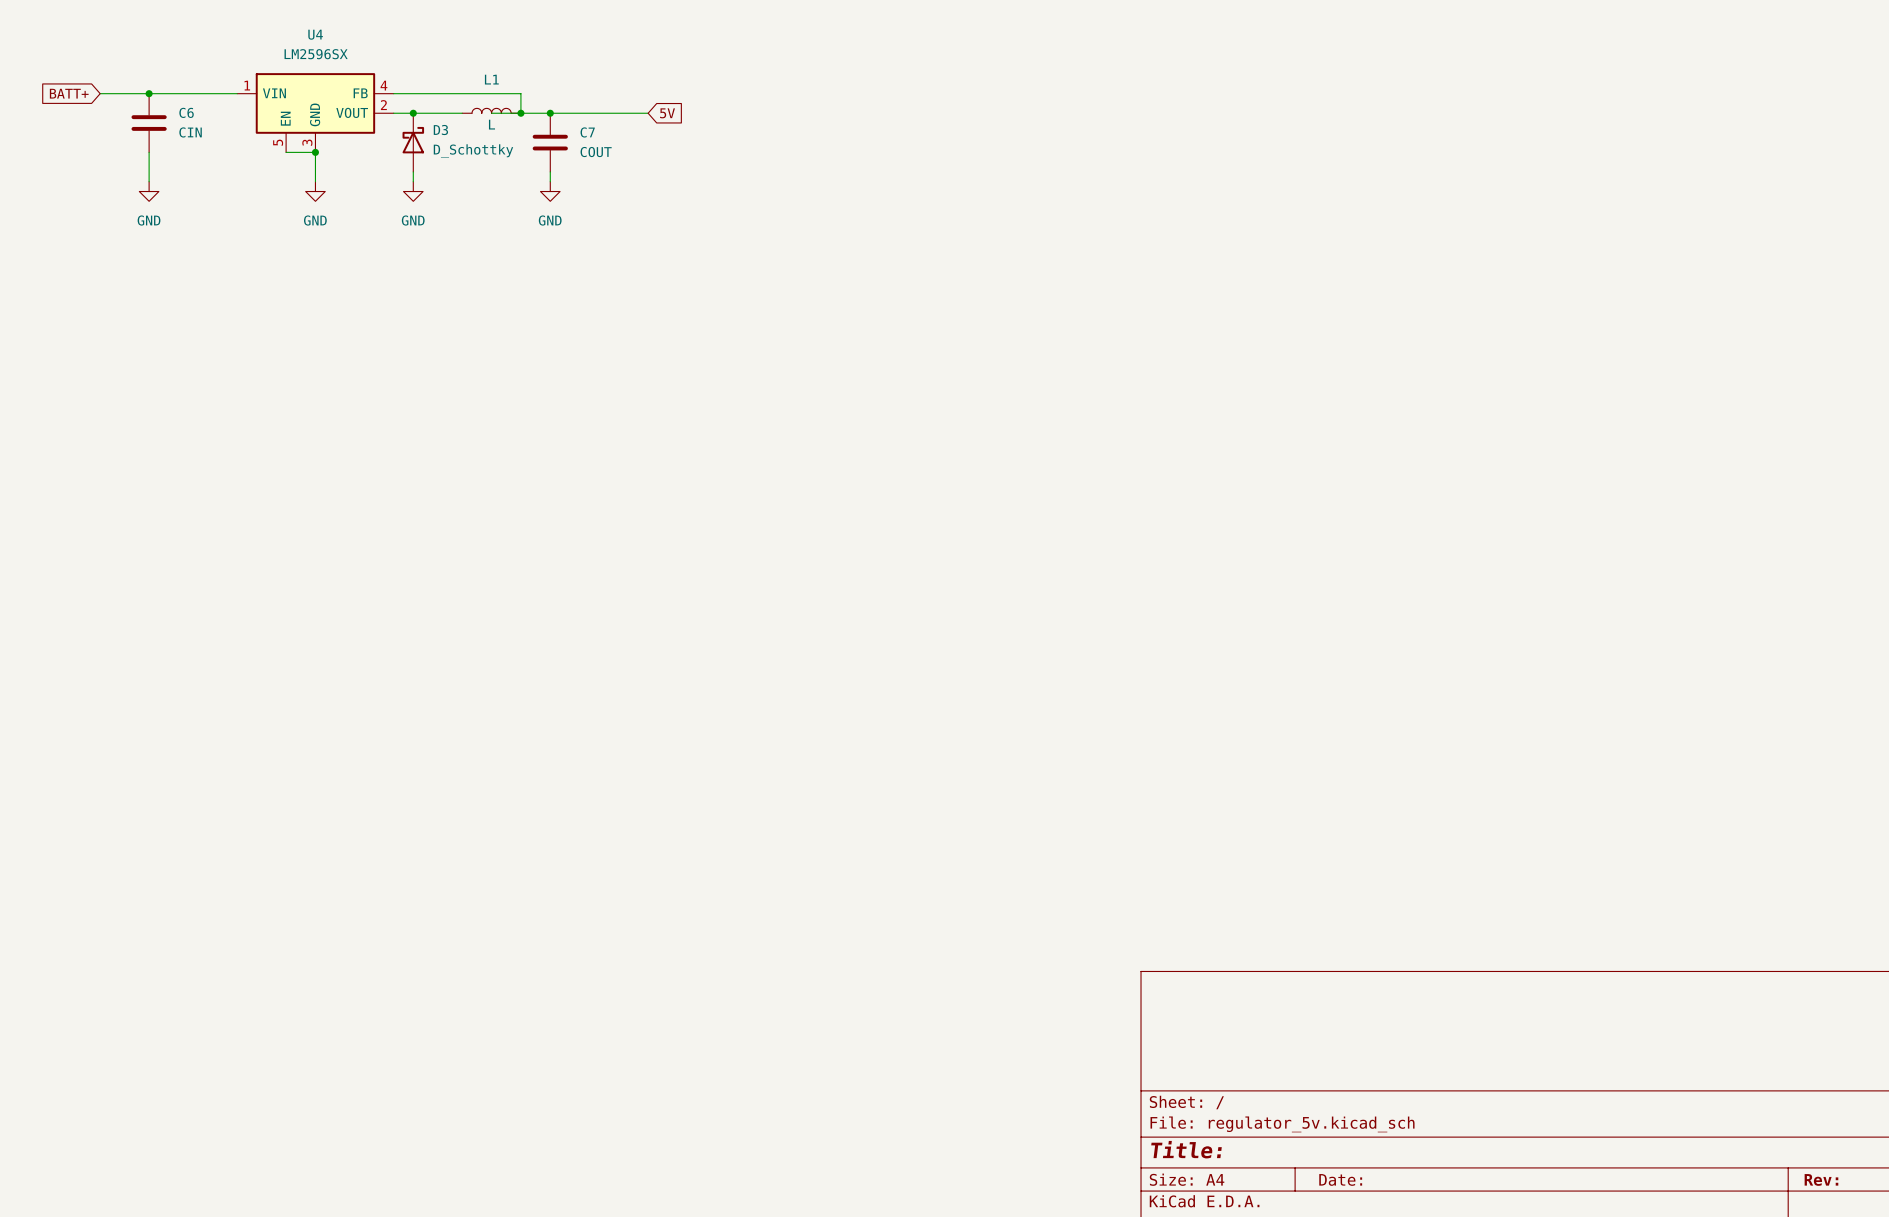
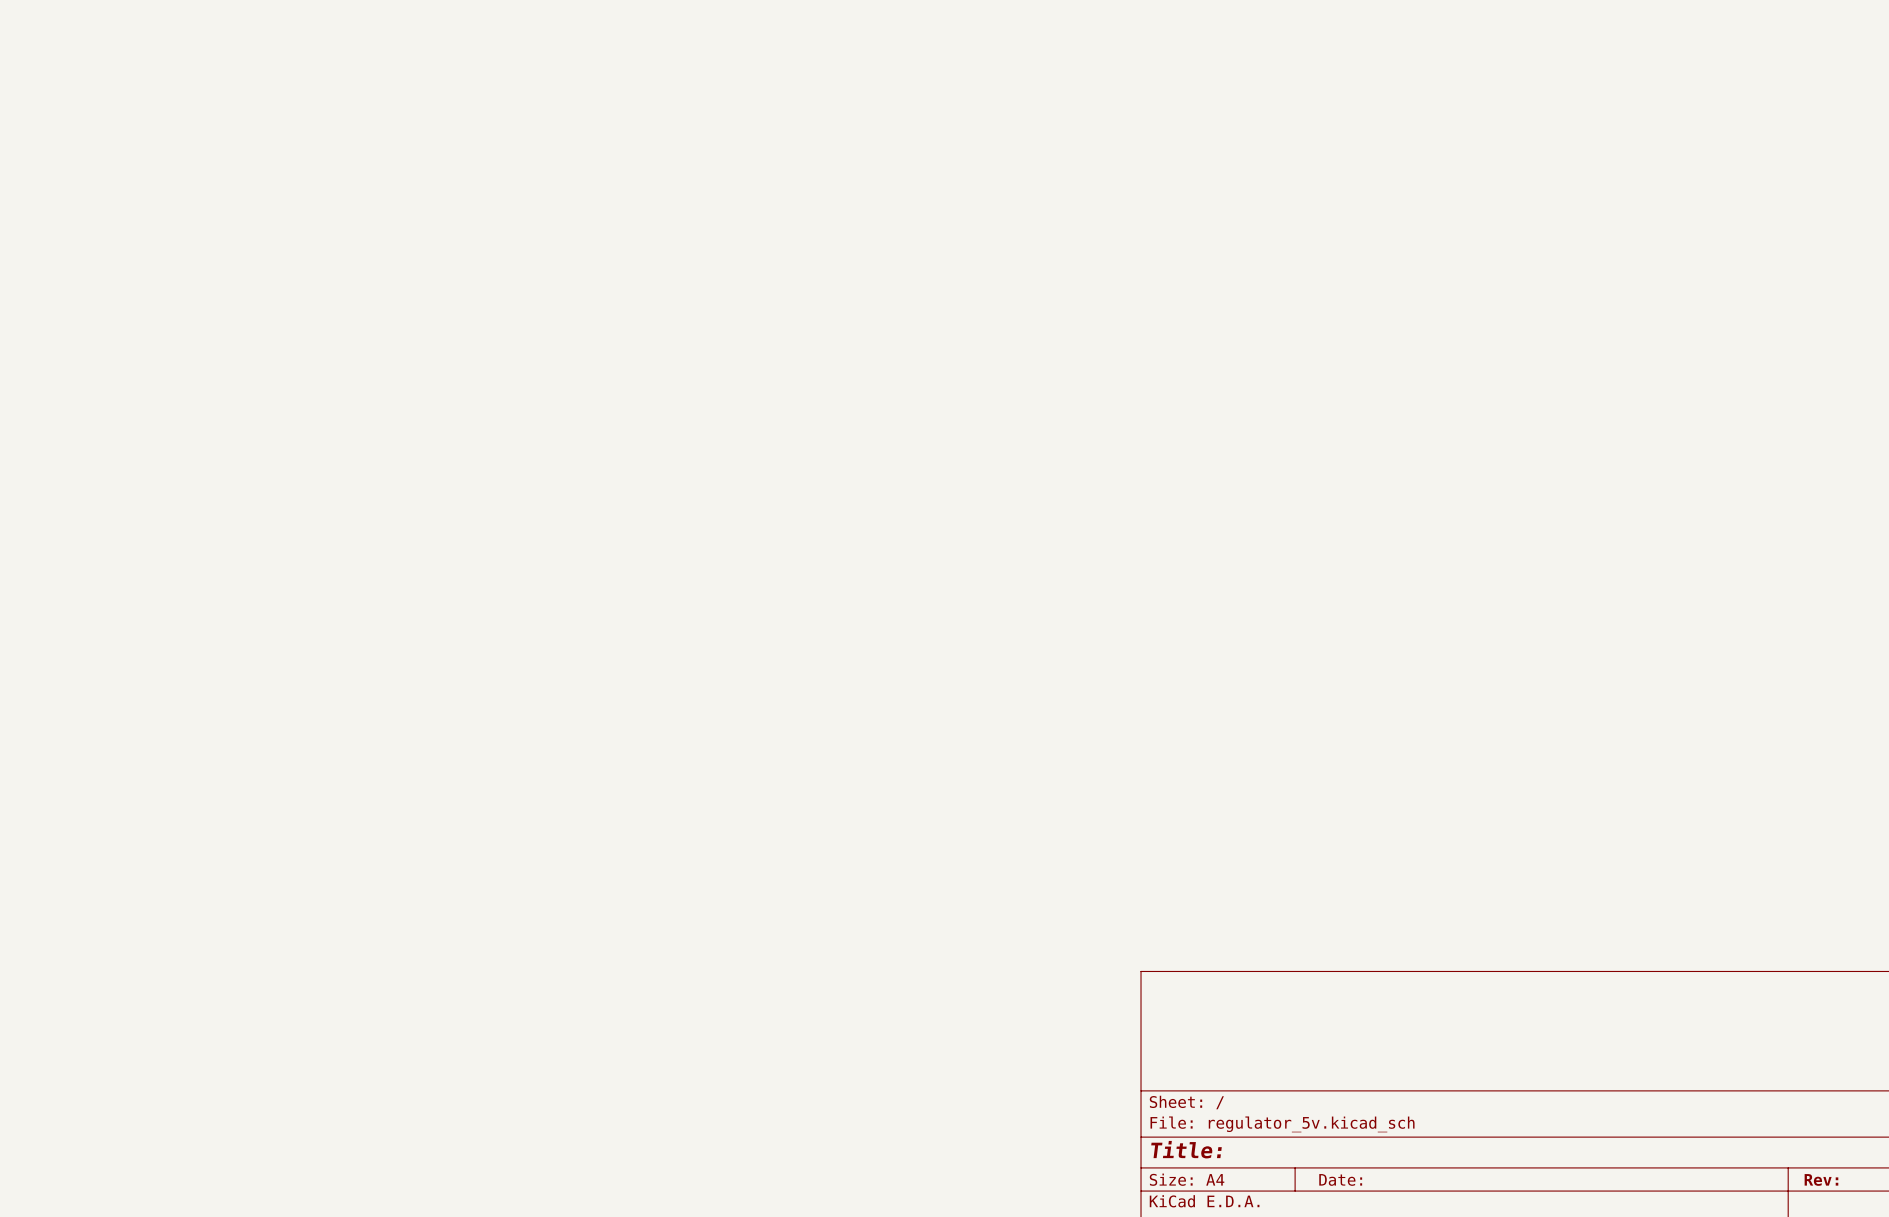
global label: BATT+ (69, 93) -> none
wire: (100, 93) (237, 93) -> none
junction: (149, 93) -> none
wire: (393, 93) (520, 93) (520, 113) -> none
L1: L (491, 110) -> none
U4: LM2596SX (315, 112) -> none
wire: (393, 113) (462, 113) -> none
junction: (413, 113) -> none
wire: (491, 113) (648, 113) -> none
junction: (520, 113) -> none
junction: (550, 113) -> none
global label: 5V (667, 113) -> none
C6: CIN (149, 123) -> none
D3: D_Schottky (413, 142) -> none
C7: COUT (550, 142) -> none
wire: (149, 152) (149, 181) -> none
wire: (286, 152) (315, 152) (315, 181) -> none
junction: (315, 152) -> none
wire: (413, 171) (413, 181) -> none
wire: (550, 171) (550, 181) -> none
power symbol: GND (149, 191) -> none
power symbol: GND (315, 191) -> none
power symbol: GND (413, 191) -> none
power symbol: GND (550, 191) -> none

